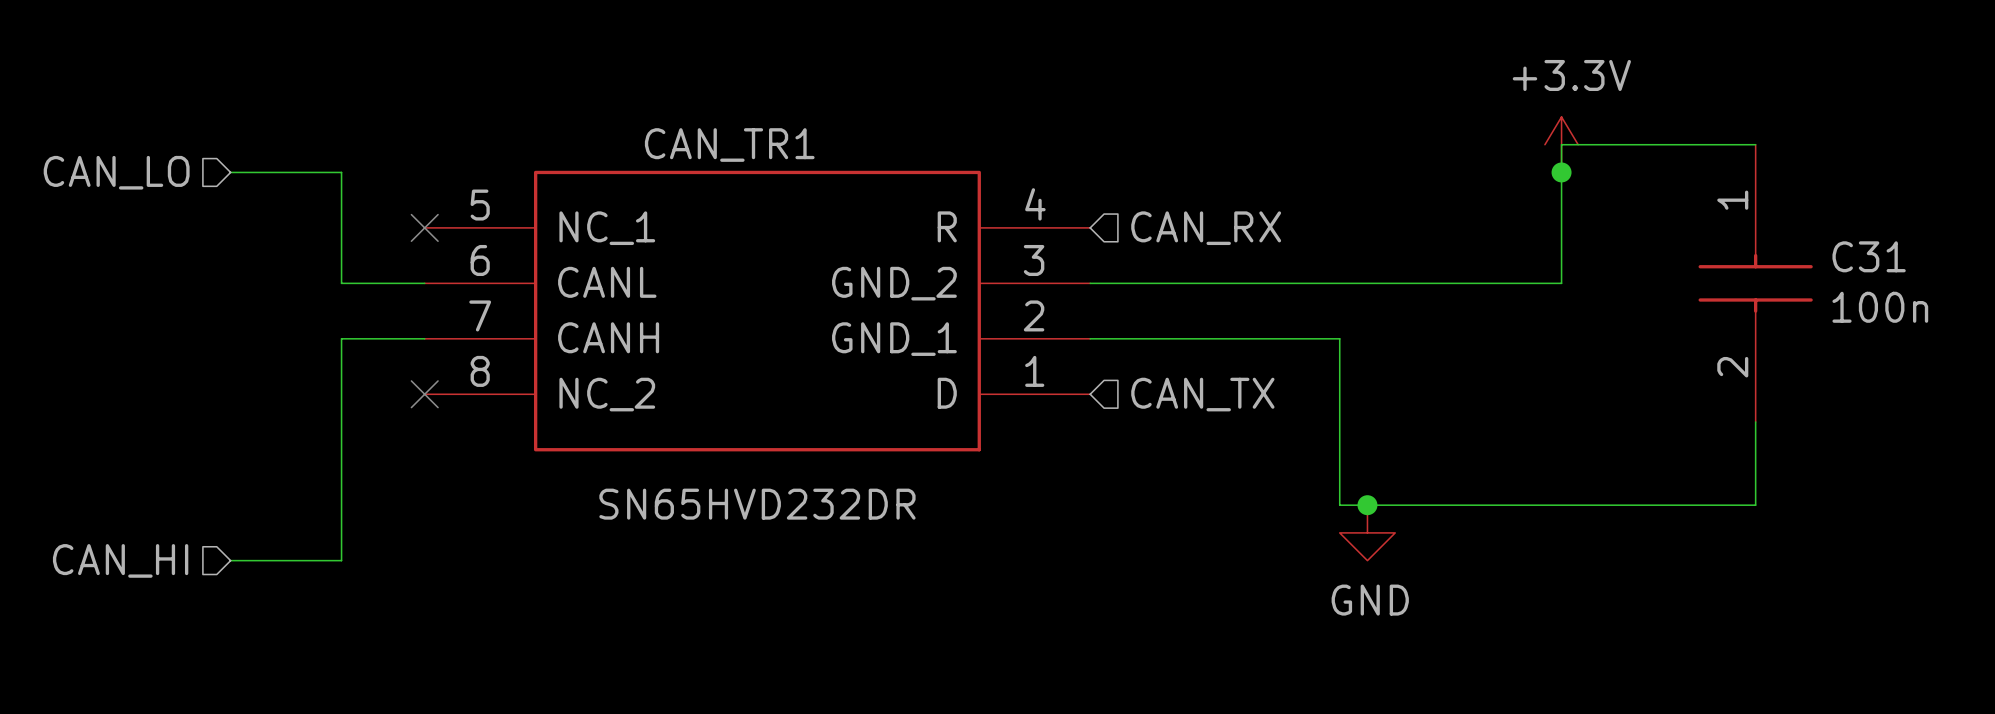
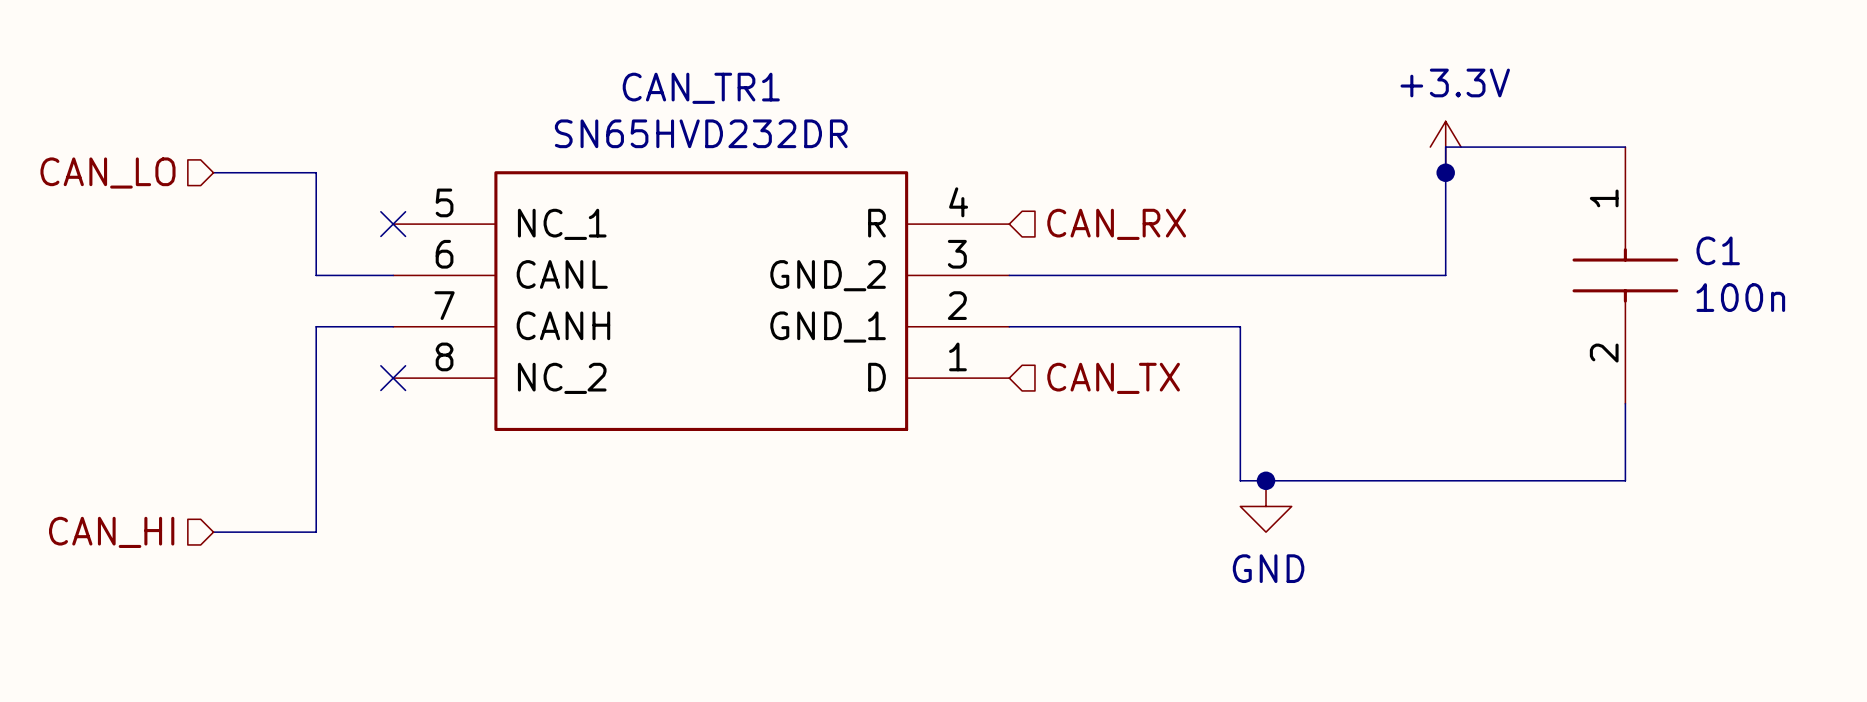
CAN_TR1 name position: CAN_TR1 (729, 145) -> CAN_TR1 (701, 88)
C31 name: C31 (1869, 256) -> C1 (1718, 250)
CAN_TR1 value position: SN65HVD232DR (757, 504) -> SN65HVD232DR (701, 133)

